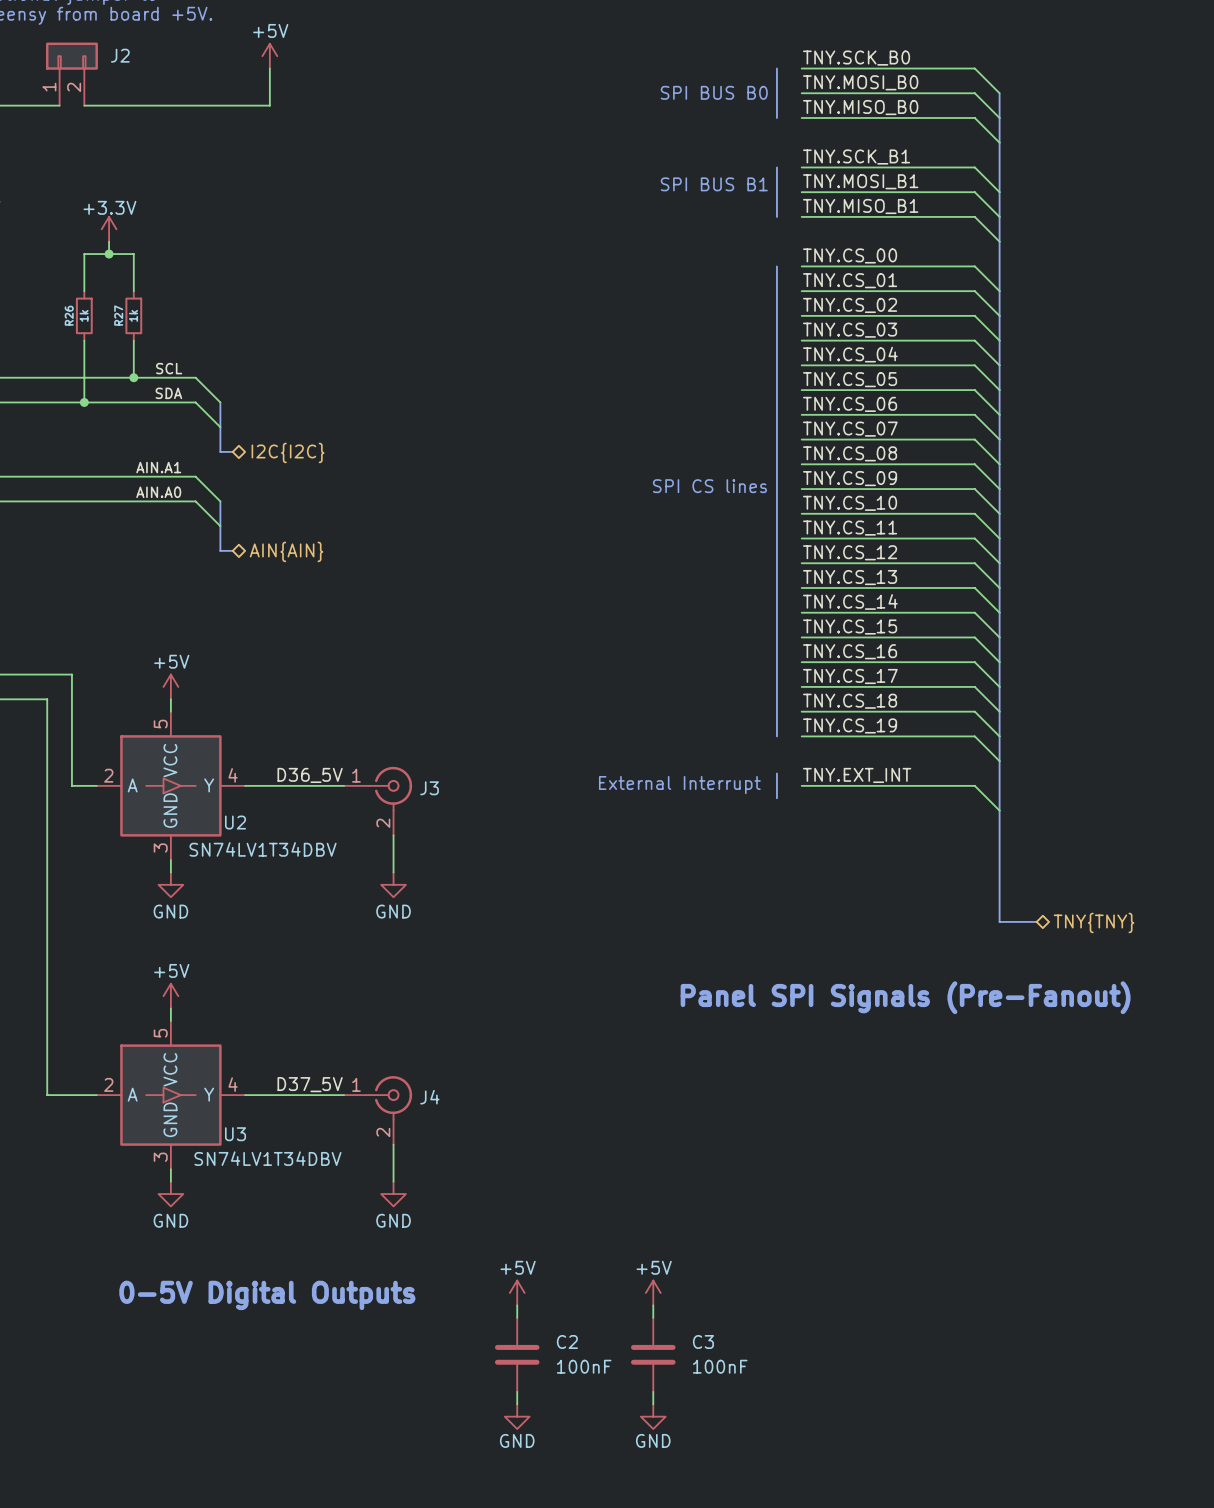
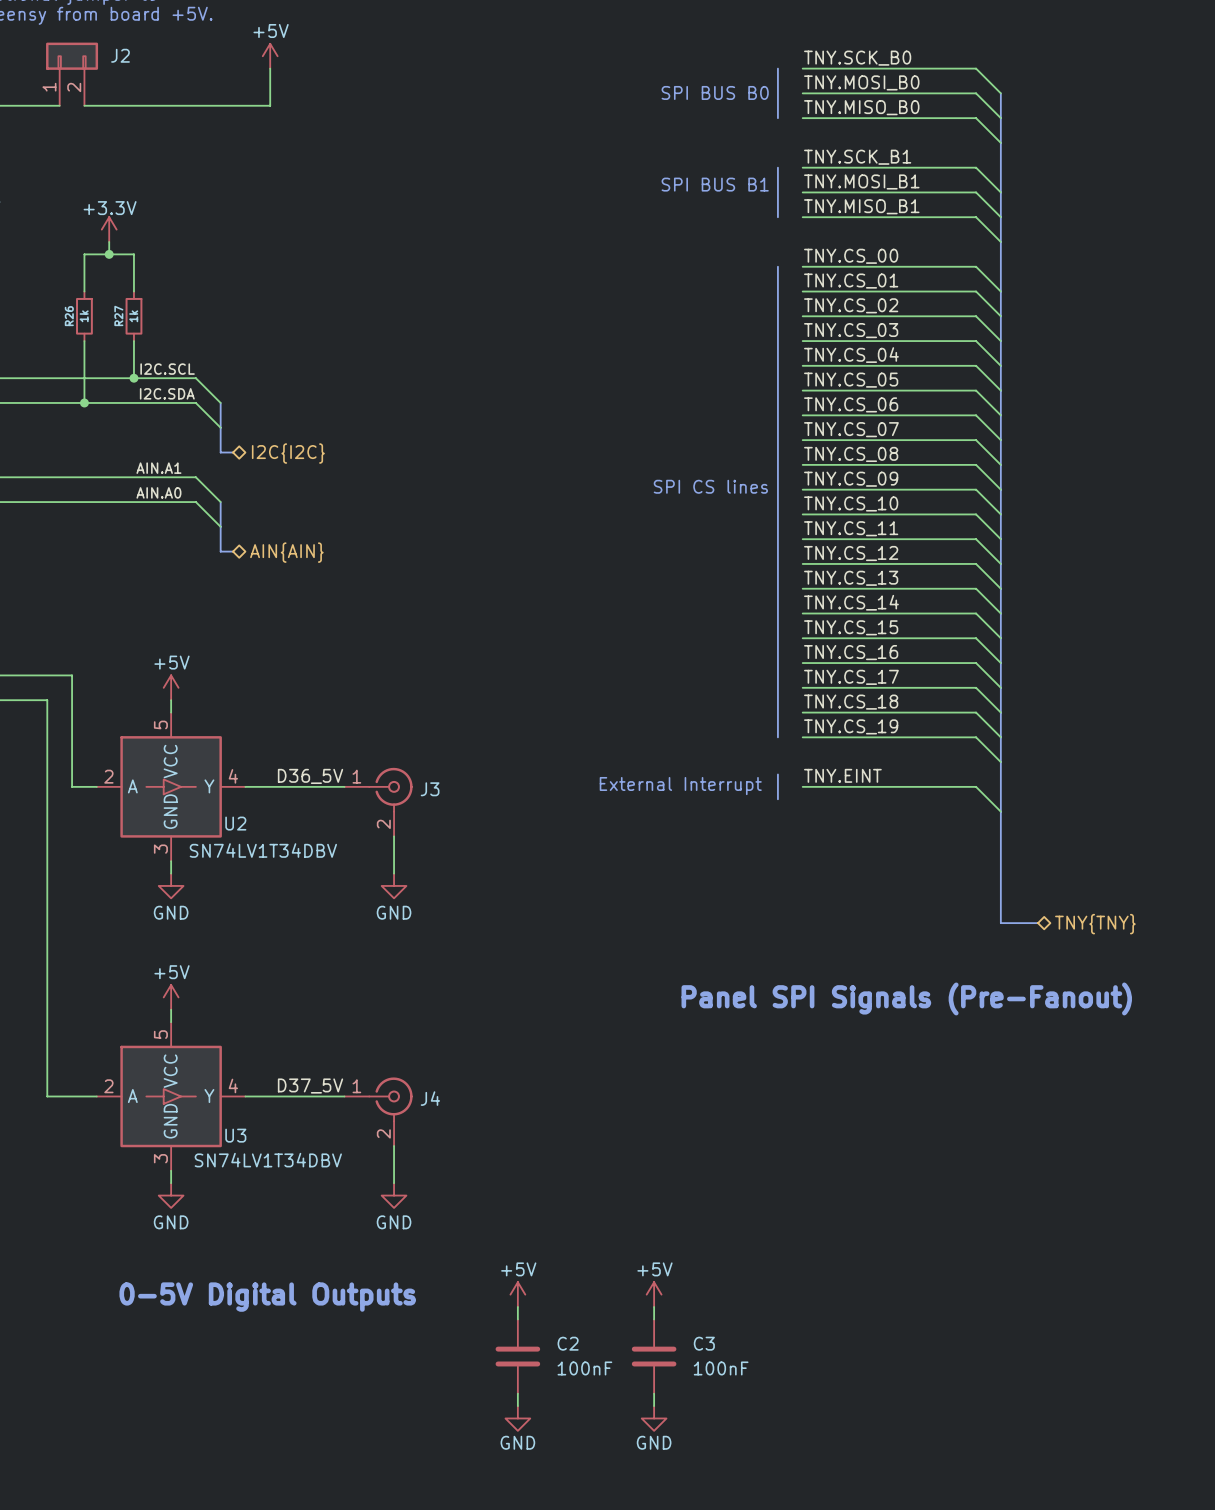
label: none -> I2C.SCL (167, 369)
label: SCL (169, 368) -> none
label: none -> I2C.SDA (167, 393)
label: SDA (168, 393) -> none
label: TNY.EXT_INT (857, 775) -> TNY.EINT (842, 775)

